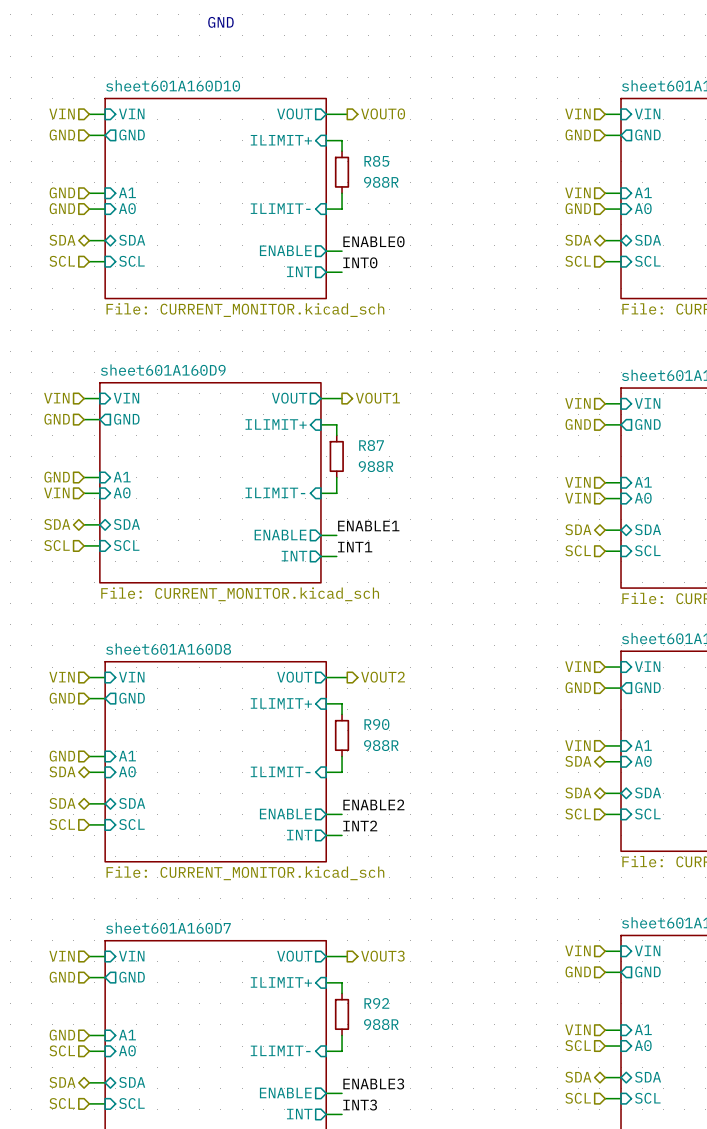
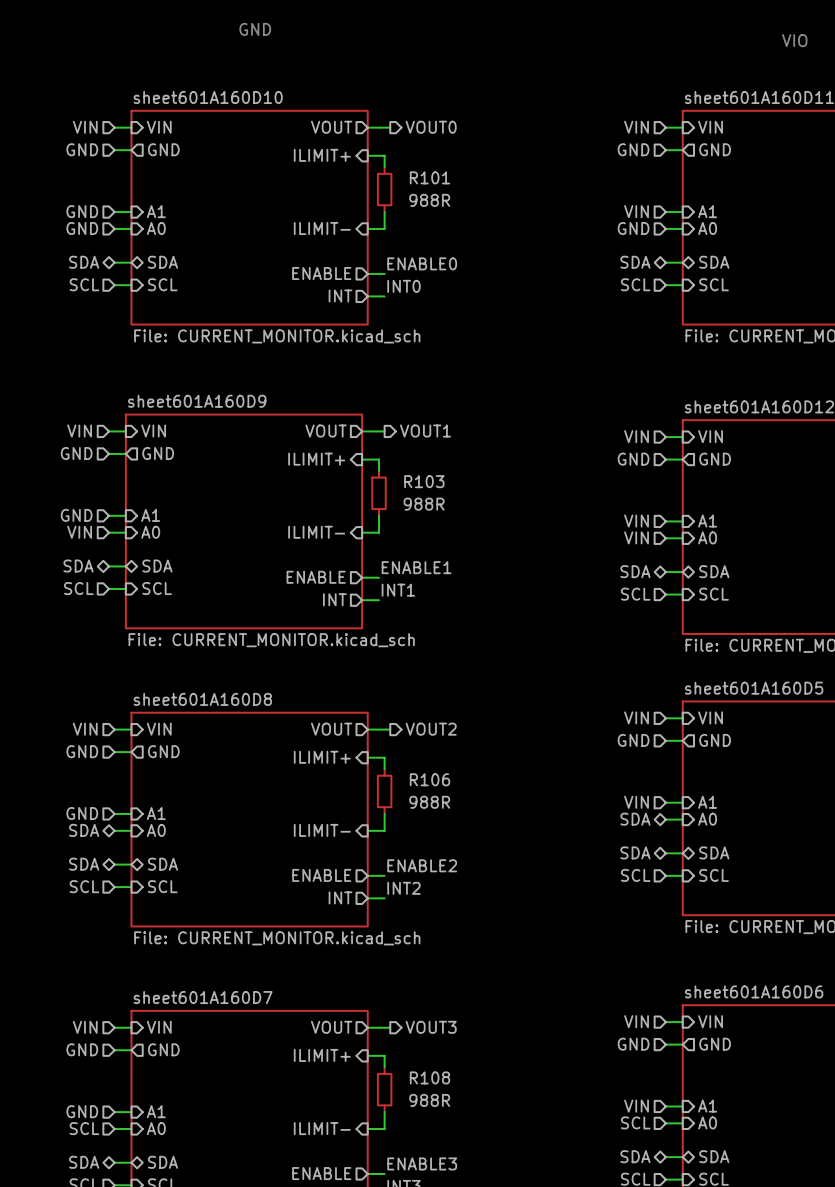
R85 name: R85 (376, 161) -> R101 (429, 177)
R87 name: R87 (371, 445) -> R103 (424, 481)
R90 name: R90 (376, 724) -> R106 (429, 779)
R92 name: R92 (376, 1003) -> R108 (429, 1077)

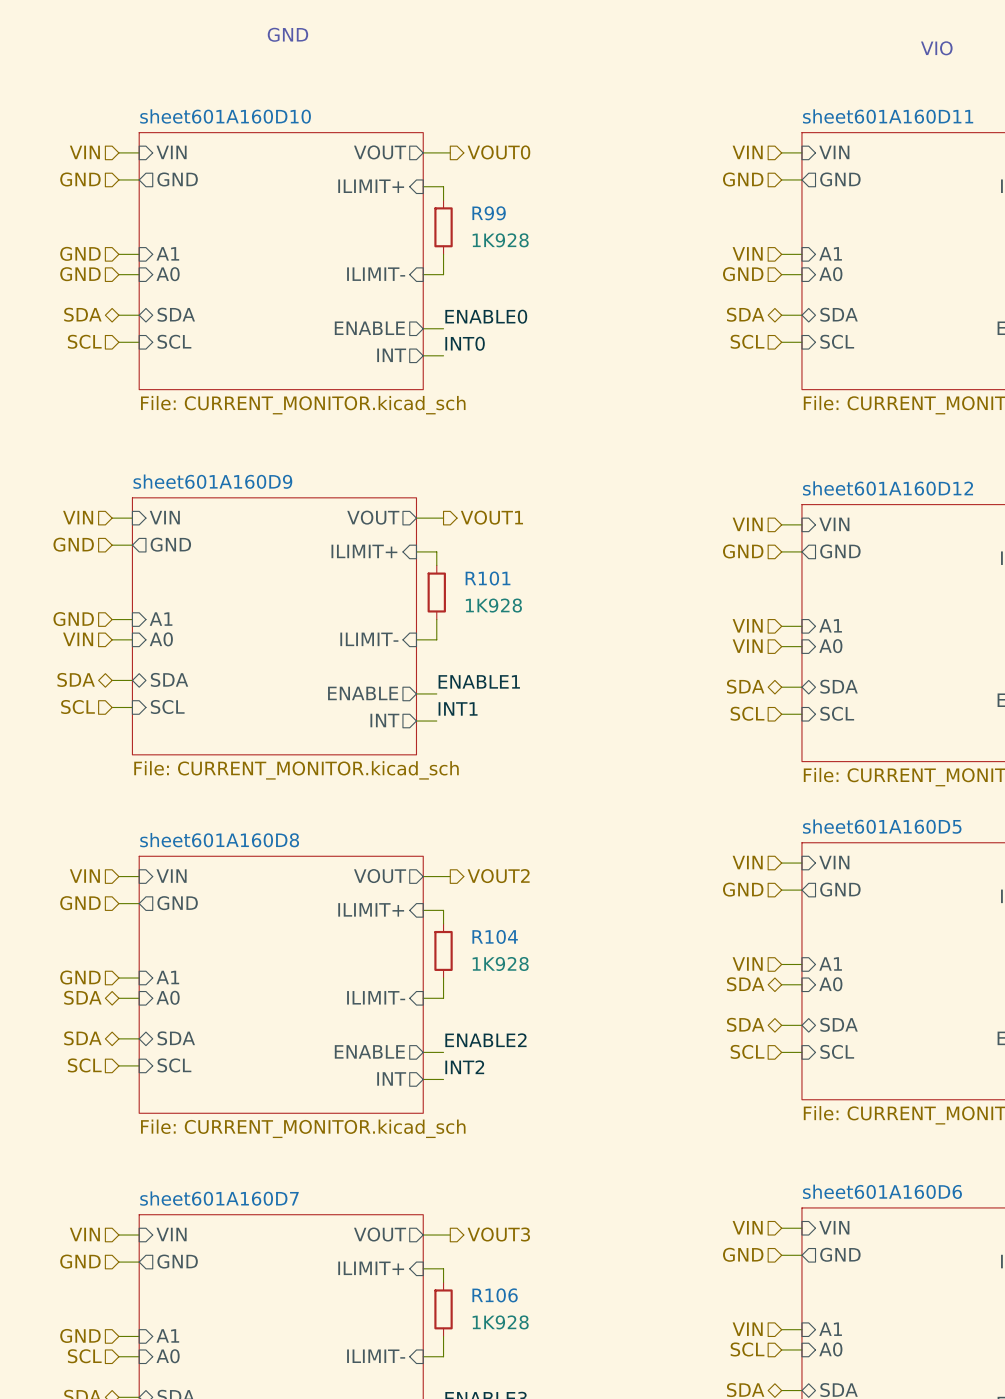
R101 name: R101 (429, 177) -> R99 (489, 213)
R101 value: 988R (429, 200) -> 1K928 (500, 240)
R103 name: R103 (424, 481) -> R101 (488, 578)
R103 value: 988R (424, 504) -> 1K928 (493, 605)
R106 name: R106 (429, 779) -> R104 (495, 936)
R106 value: 988R (429, 802) -> 1K928 (500, 963)
R108 name: R108 (429, 1077) -> R106 (495, 1295)
R108 value: 988R (429, 1100) -> 1K928 (500, 1322)

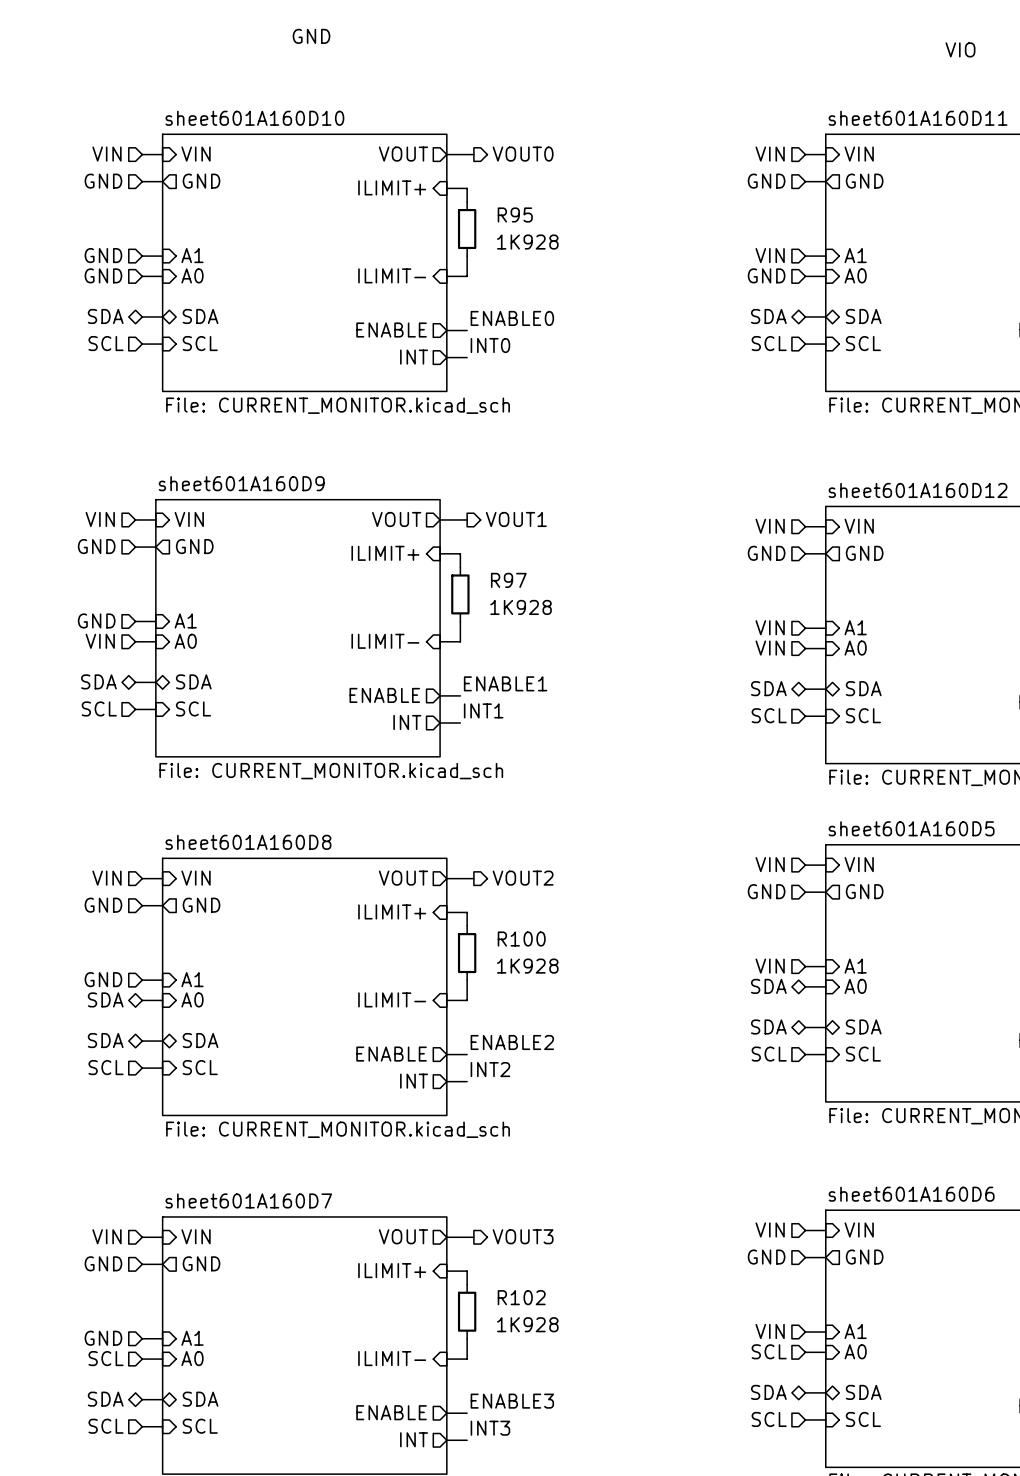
R99 name: R99 (489, 213) -> R95 (515, 214)
R101 name: R101 (488, 578) -> R97 (508, 580)
R104 name: R104 (495, 936) -> R100 (521, 939)
R106 name: R106 (495, 1295) -> R102 (521, 1297)

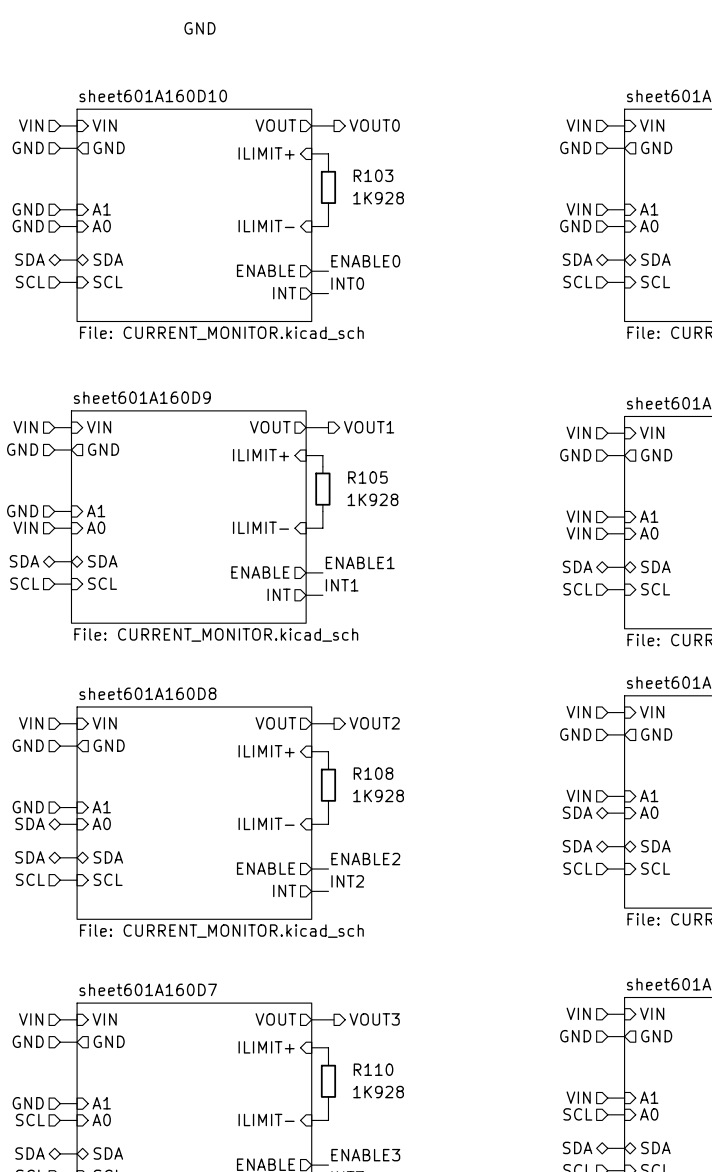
R95 name: R95 (515, 214) -> R103 (373, 175)
R97 name: R97 (508, 580) -> R105 (367, 477)
R100 name: R100 (521, 939) -> R108 (373, 773)
R102 name: R102 (521, 1297) -> R110 (373, 1069)

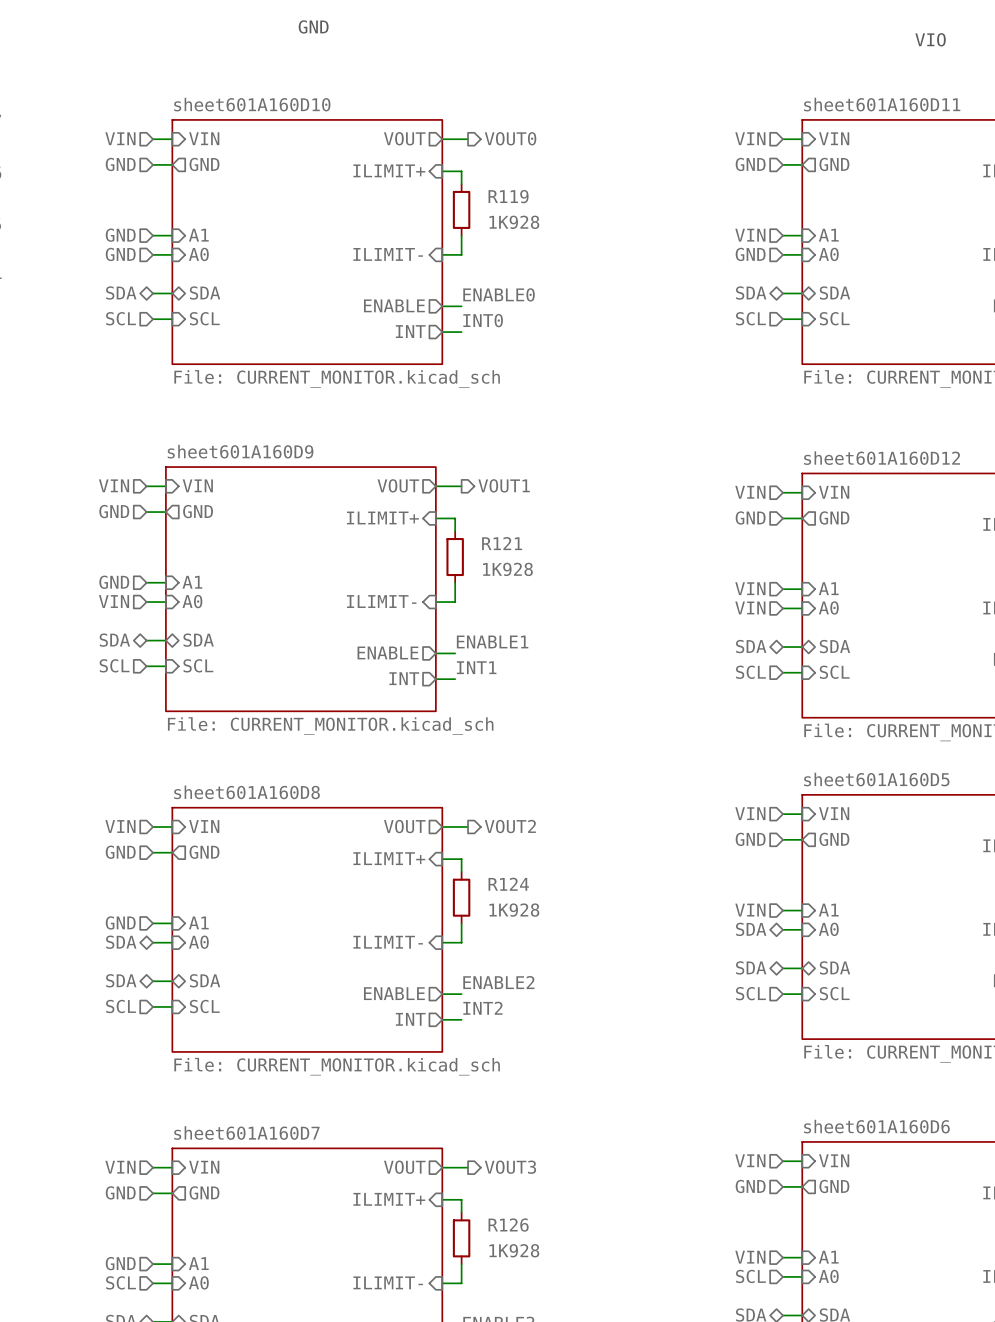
R103 name: R103 (373, 175) -> R119 (508, 196)
R105 name: R105 (367, 477) -> R121 (502, 543)
R108 name: R108 (373, 773) -> R124 (508, 884)
R110 name: R110 (373, 1069) -> R126 (508, 1225)

